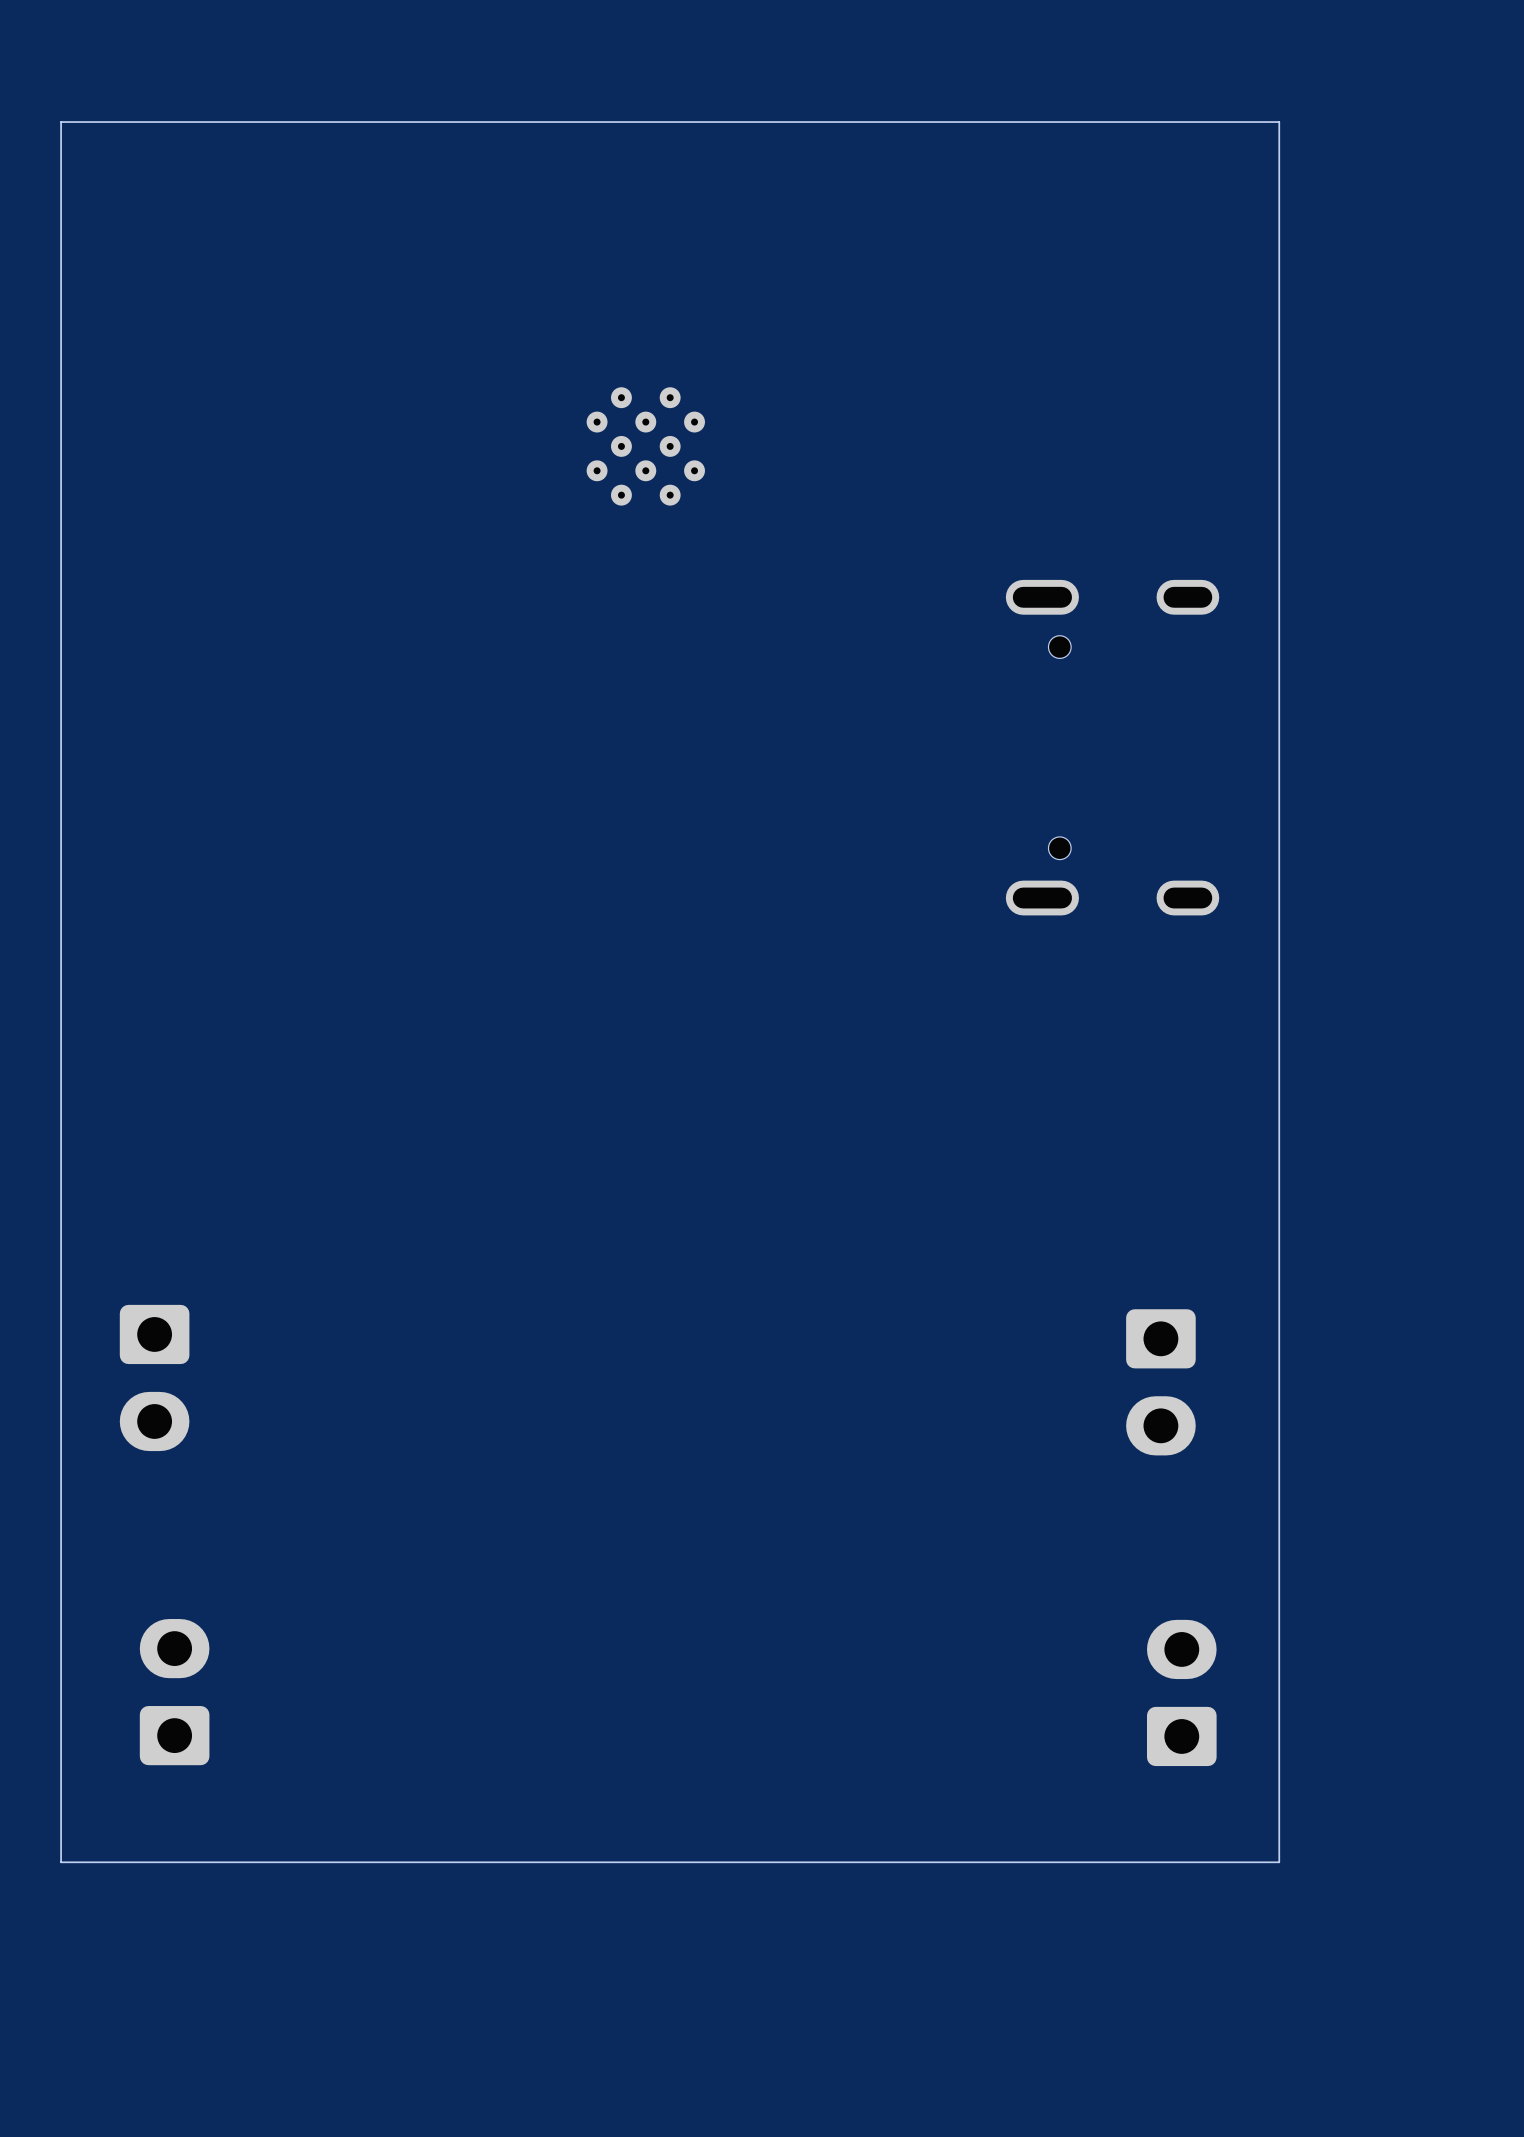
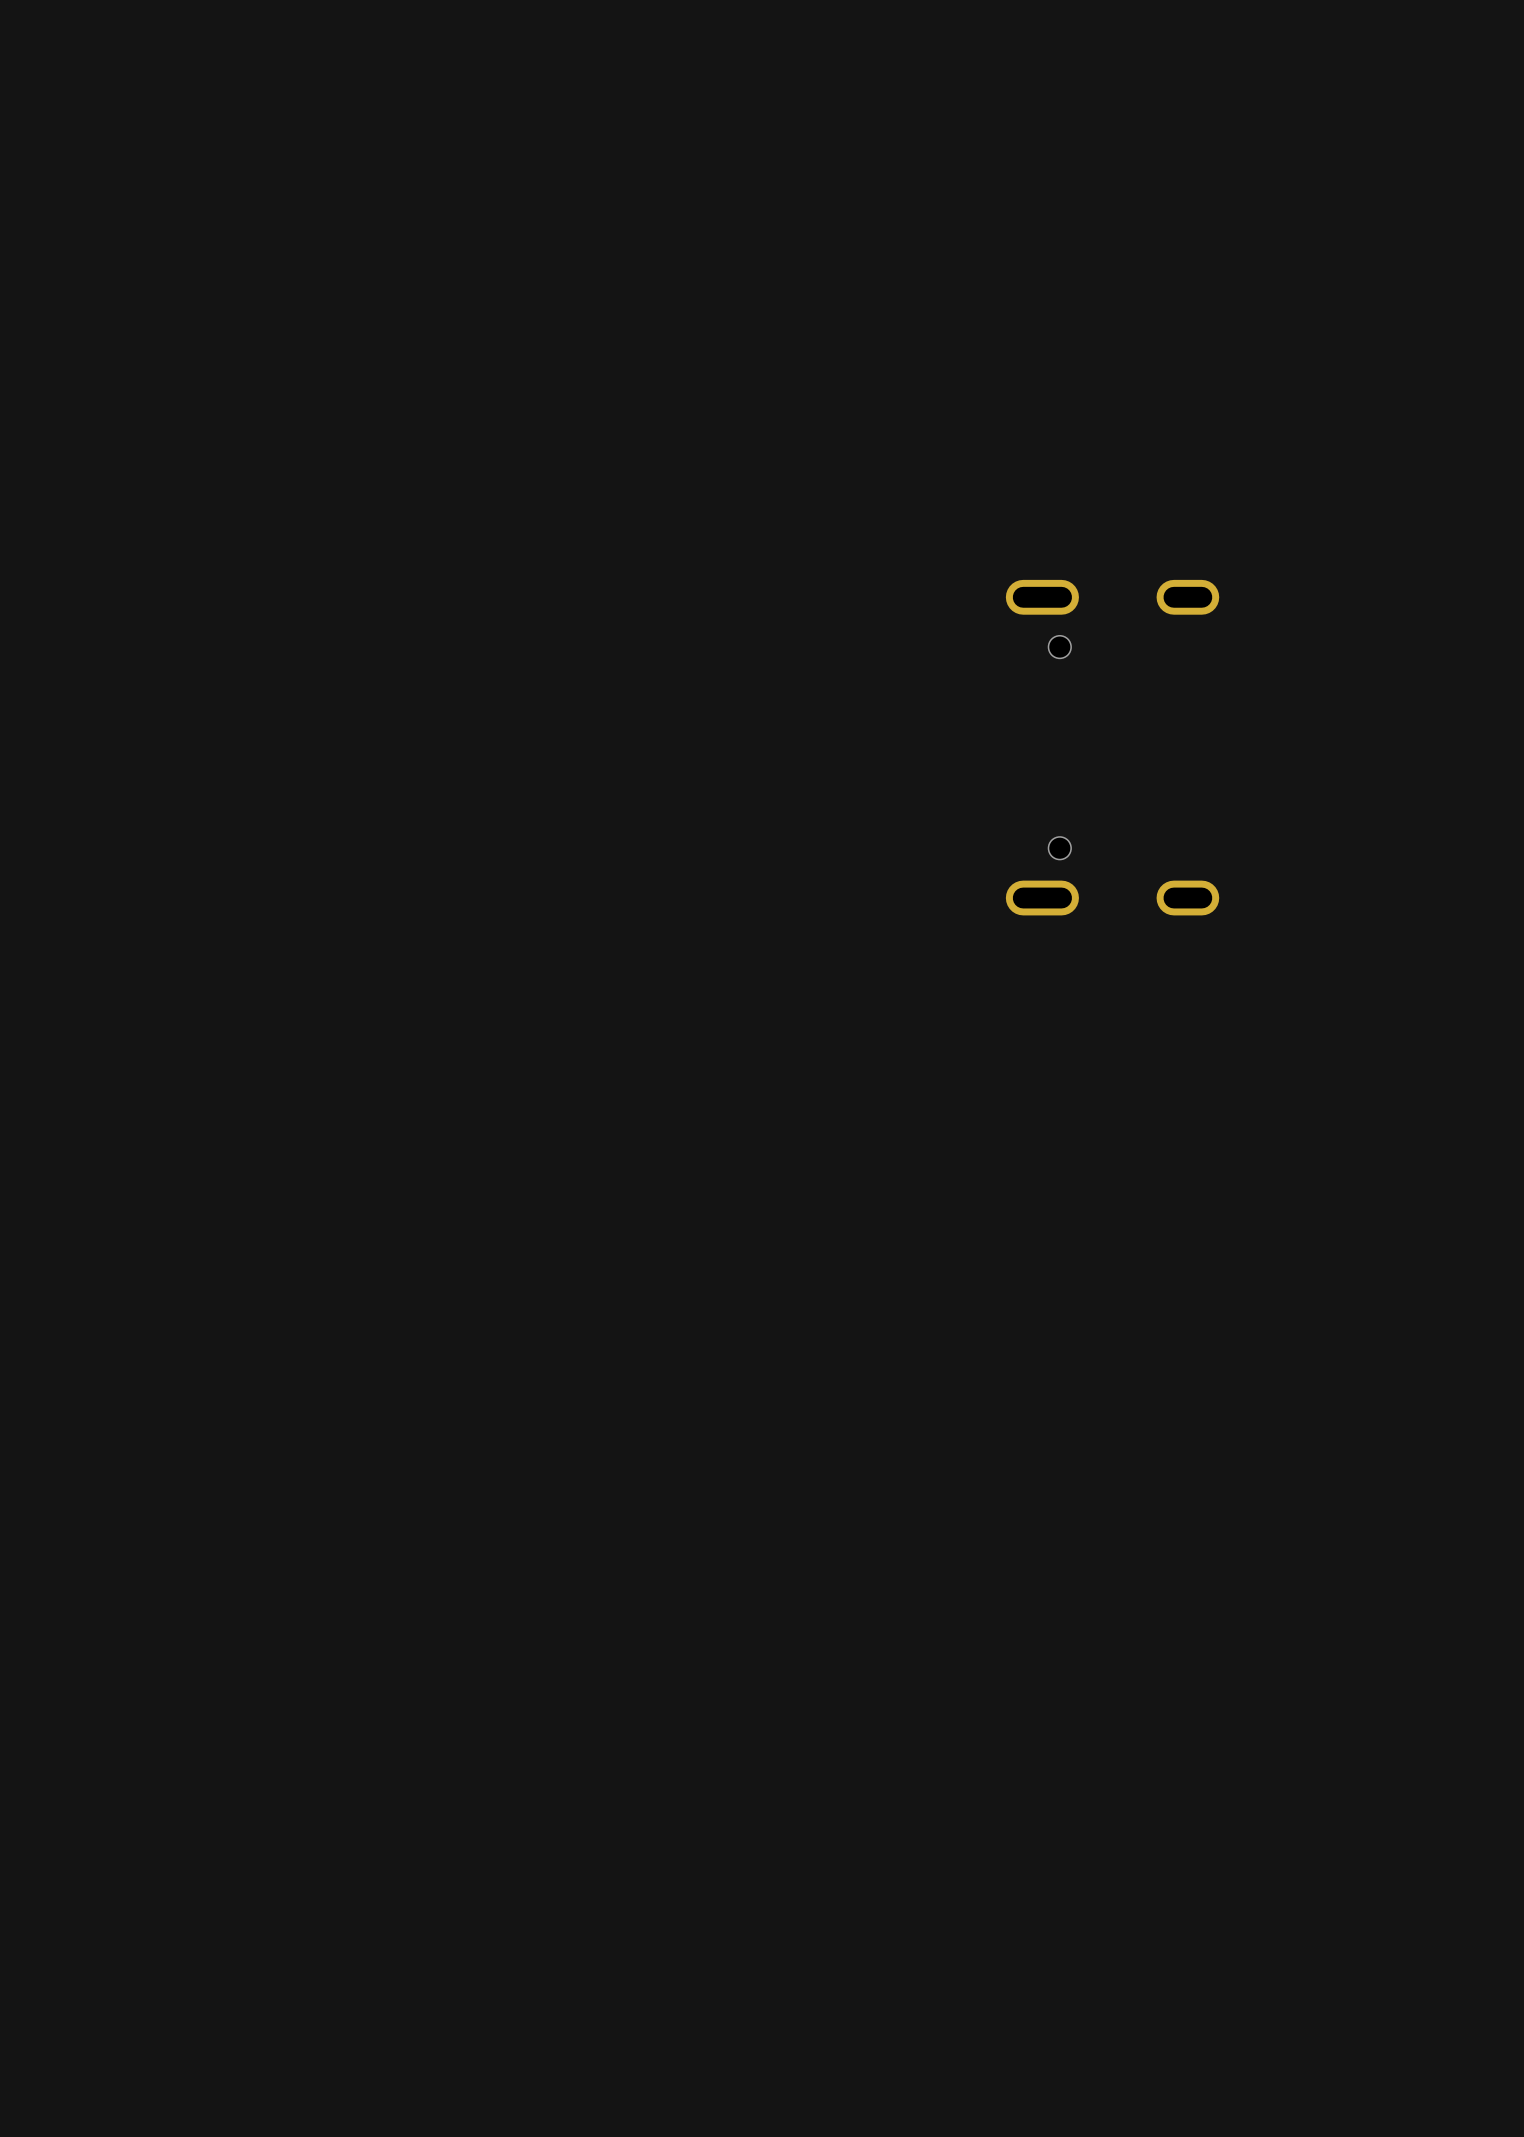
board edge: (1279, 122) (61, 122) (61, 1862) (1279, 1862) (1279, 122) -> none
part: (645, 446) -> none
part: (154, 1377) -> none
part: (1160, 1382) -> none
part: (174, 1692) -> none
part: (1181, 1692) -> none

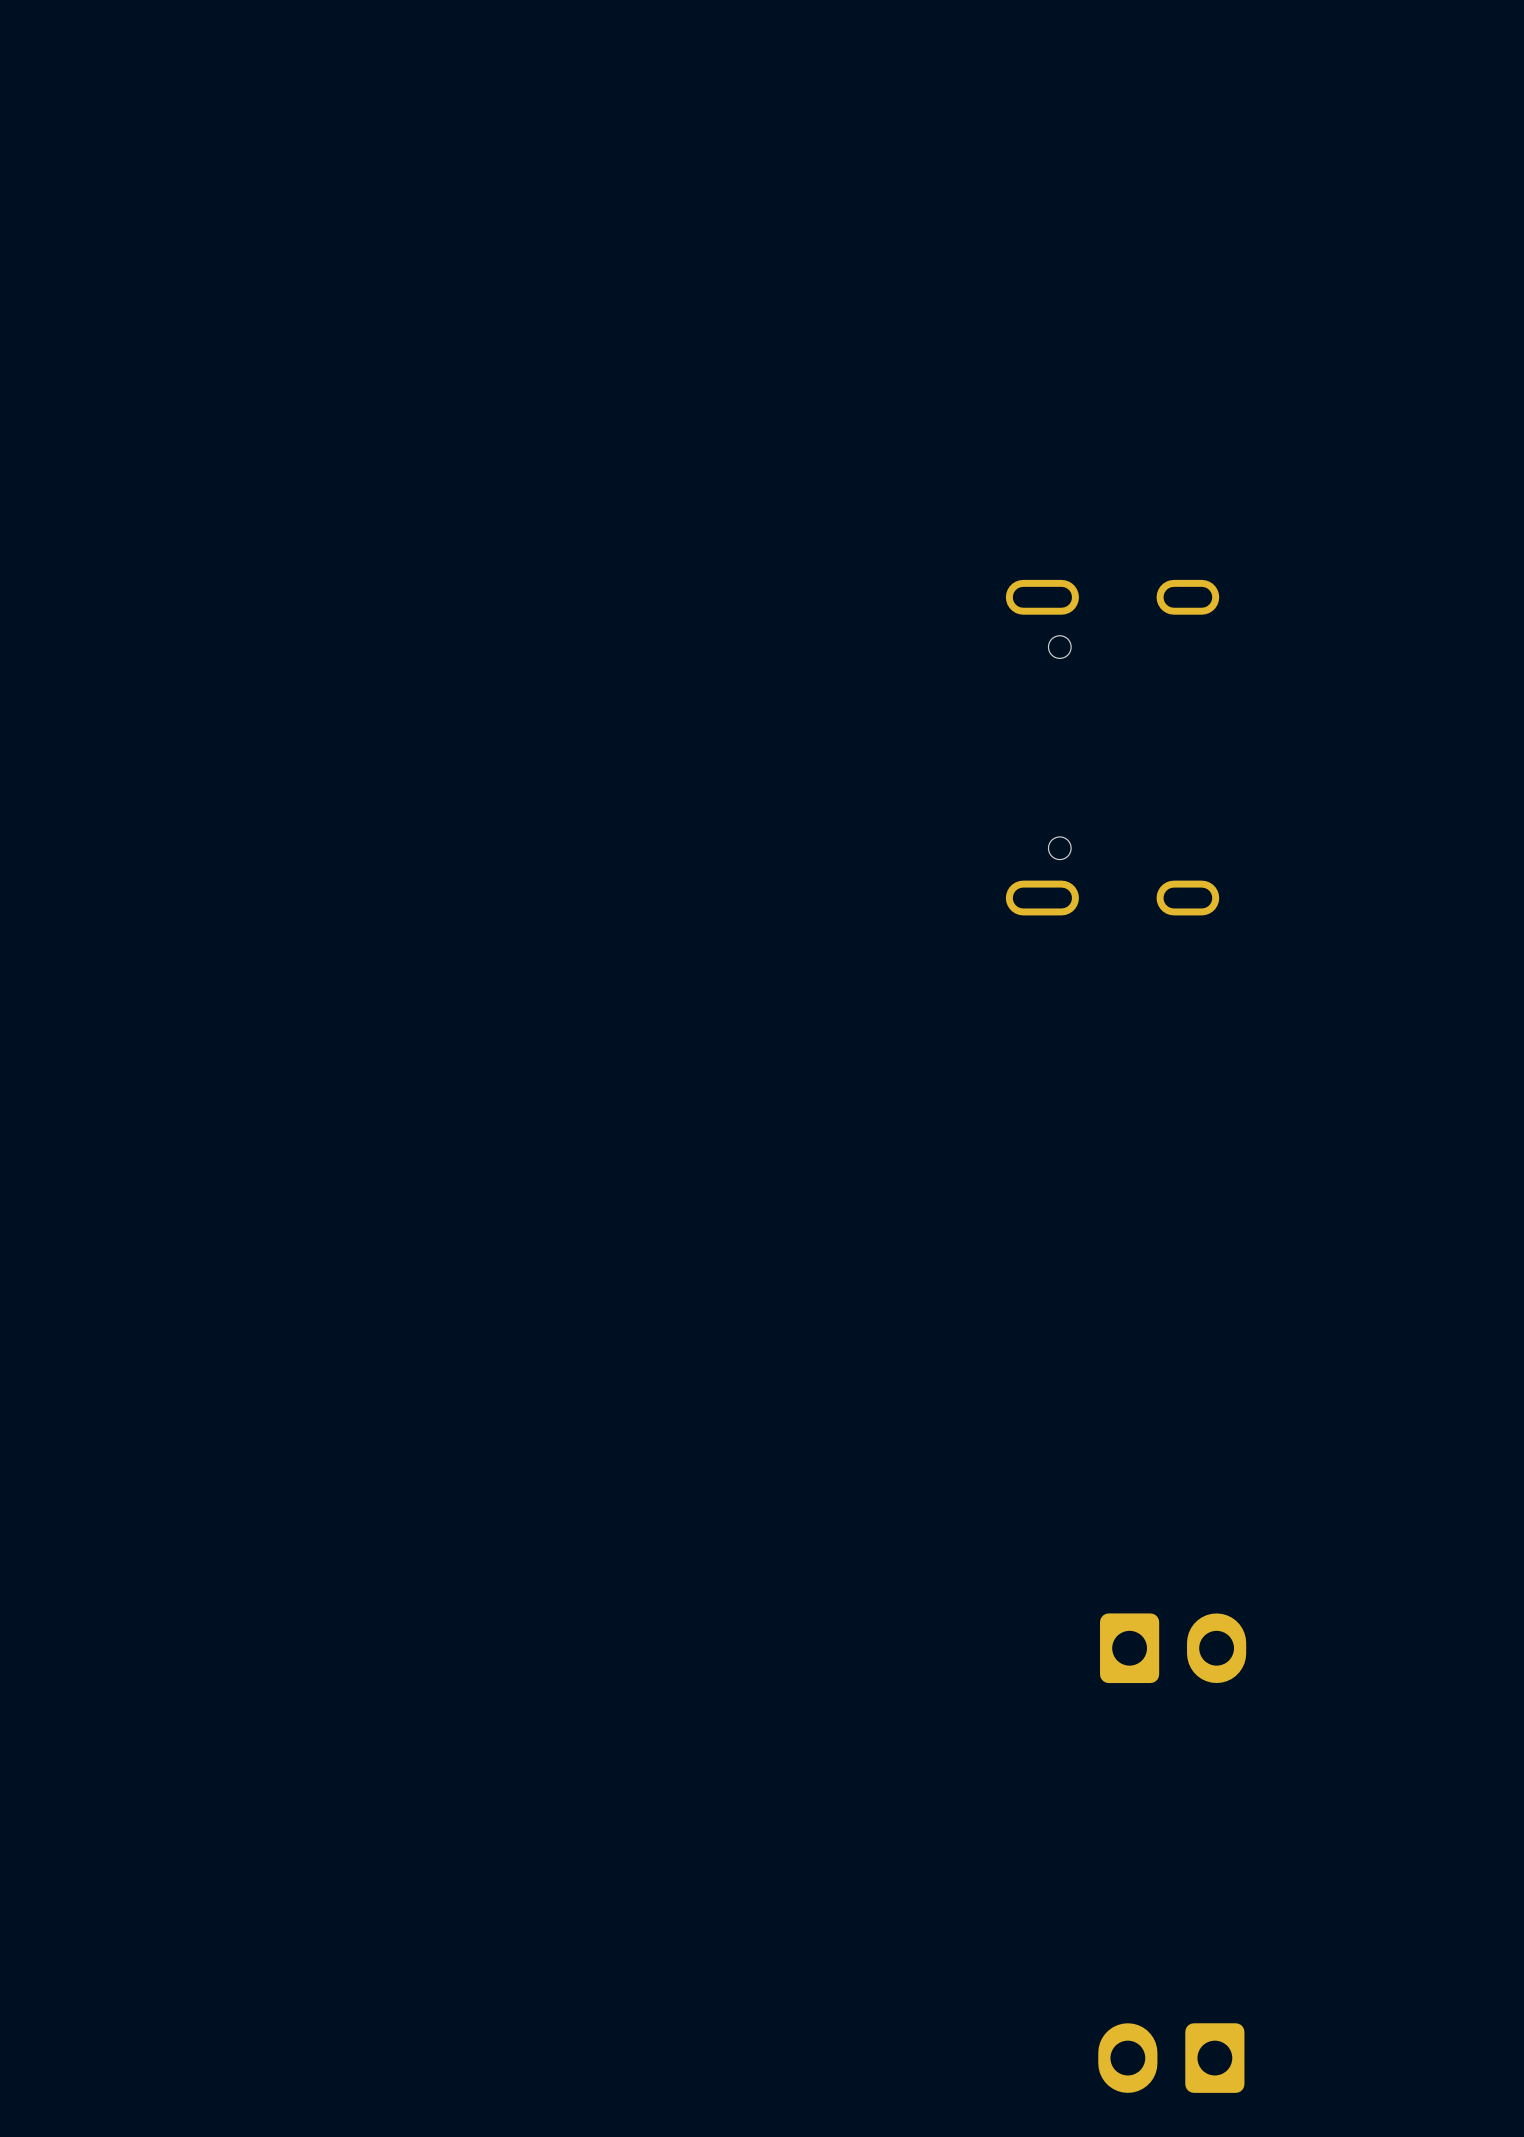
part: none -> (1173, 1648)
part: none -> (1171, 2058)

